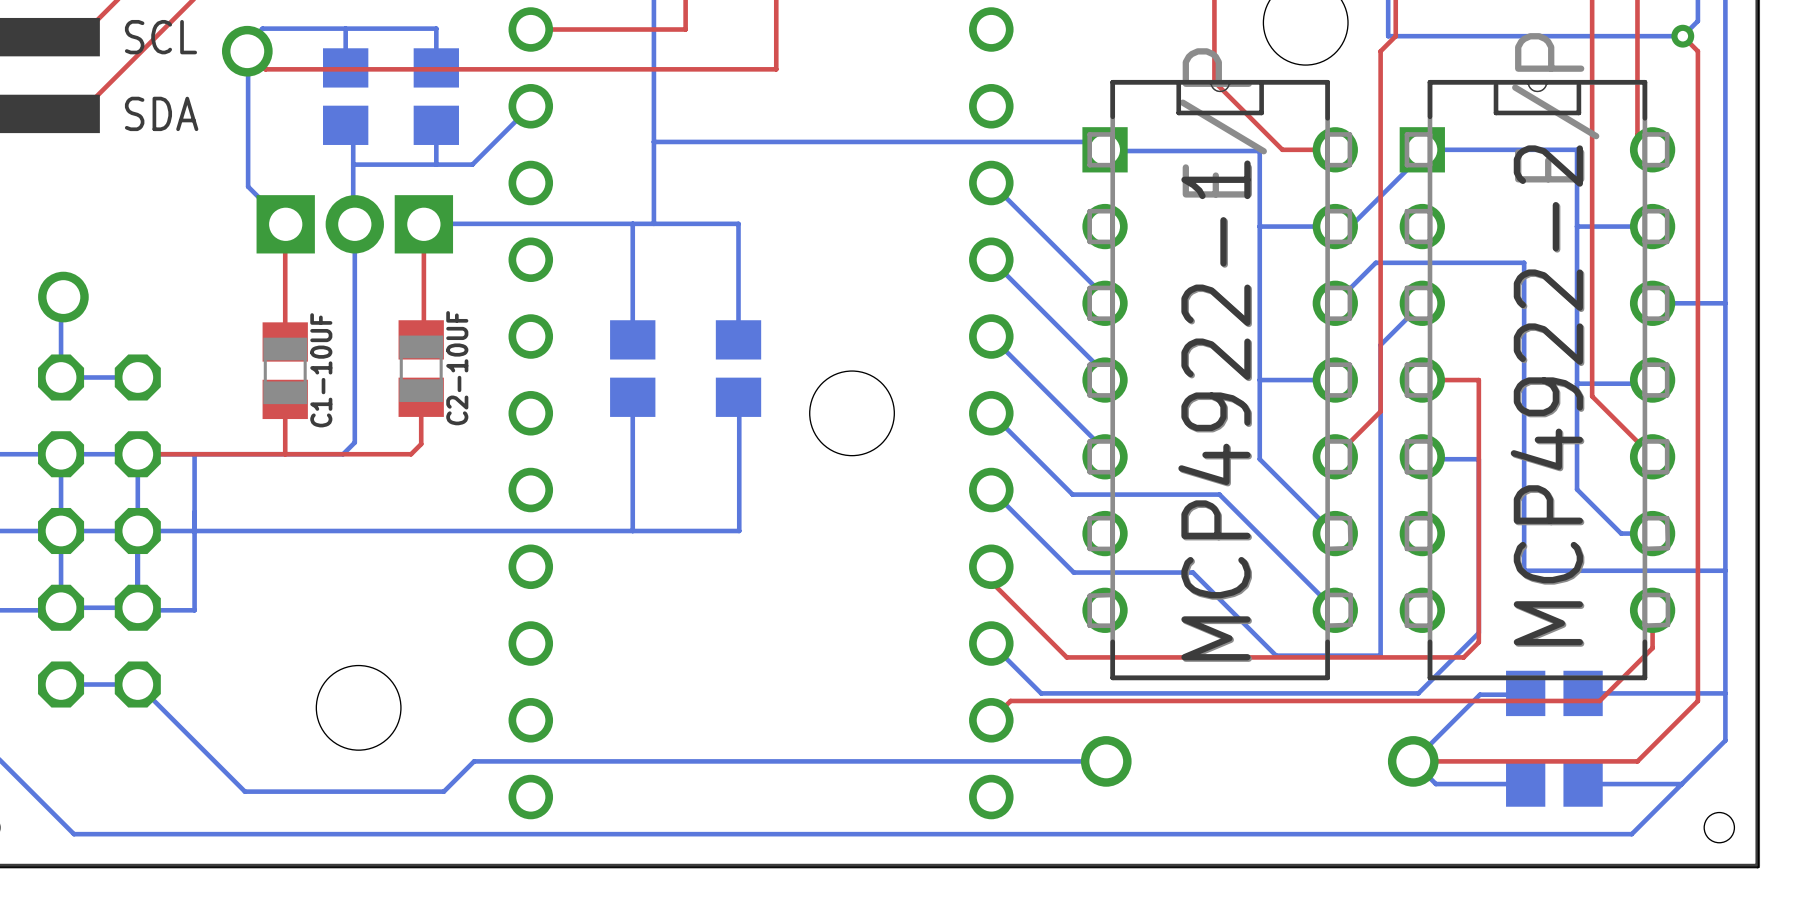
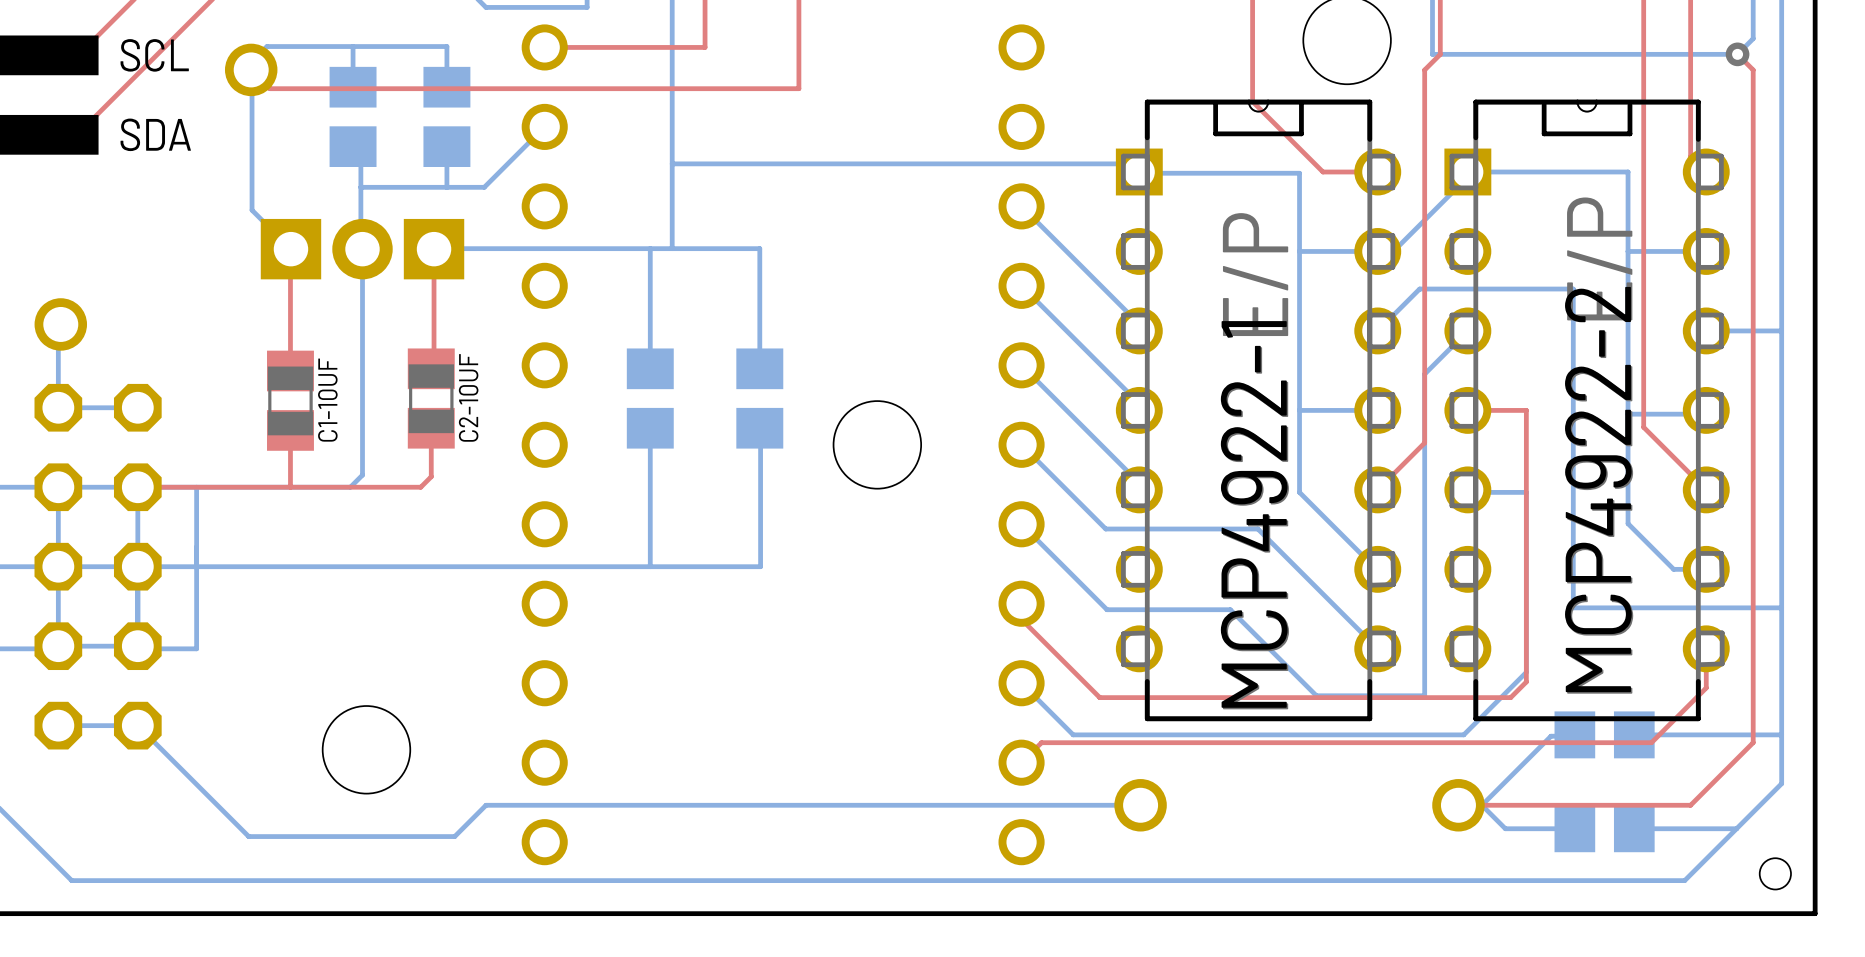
bottom track: (1502, 694) (1479, 694) (1413, 761) (1435, 784) (1458, 784) -> (1551, 736) (1481, 805)
bottom track: none -> (1481, 805) (1505, 828)

